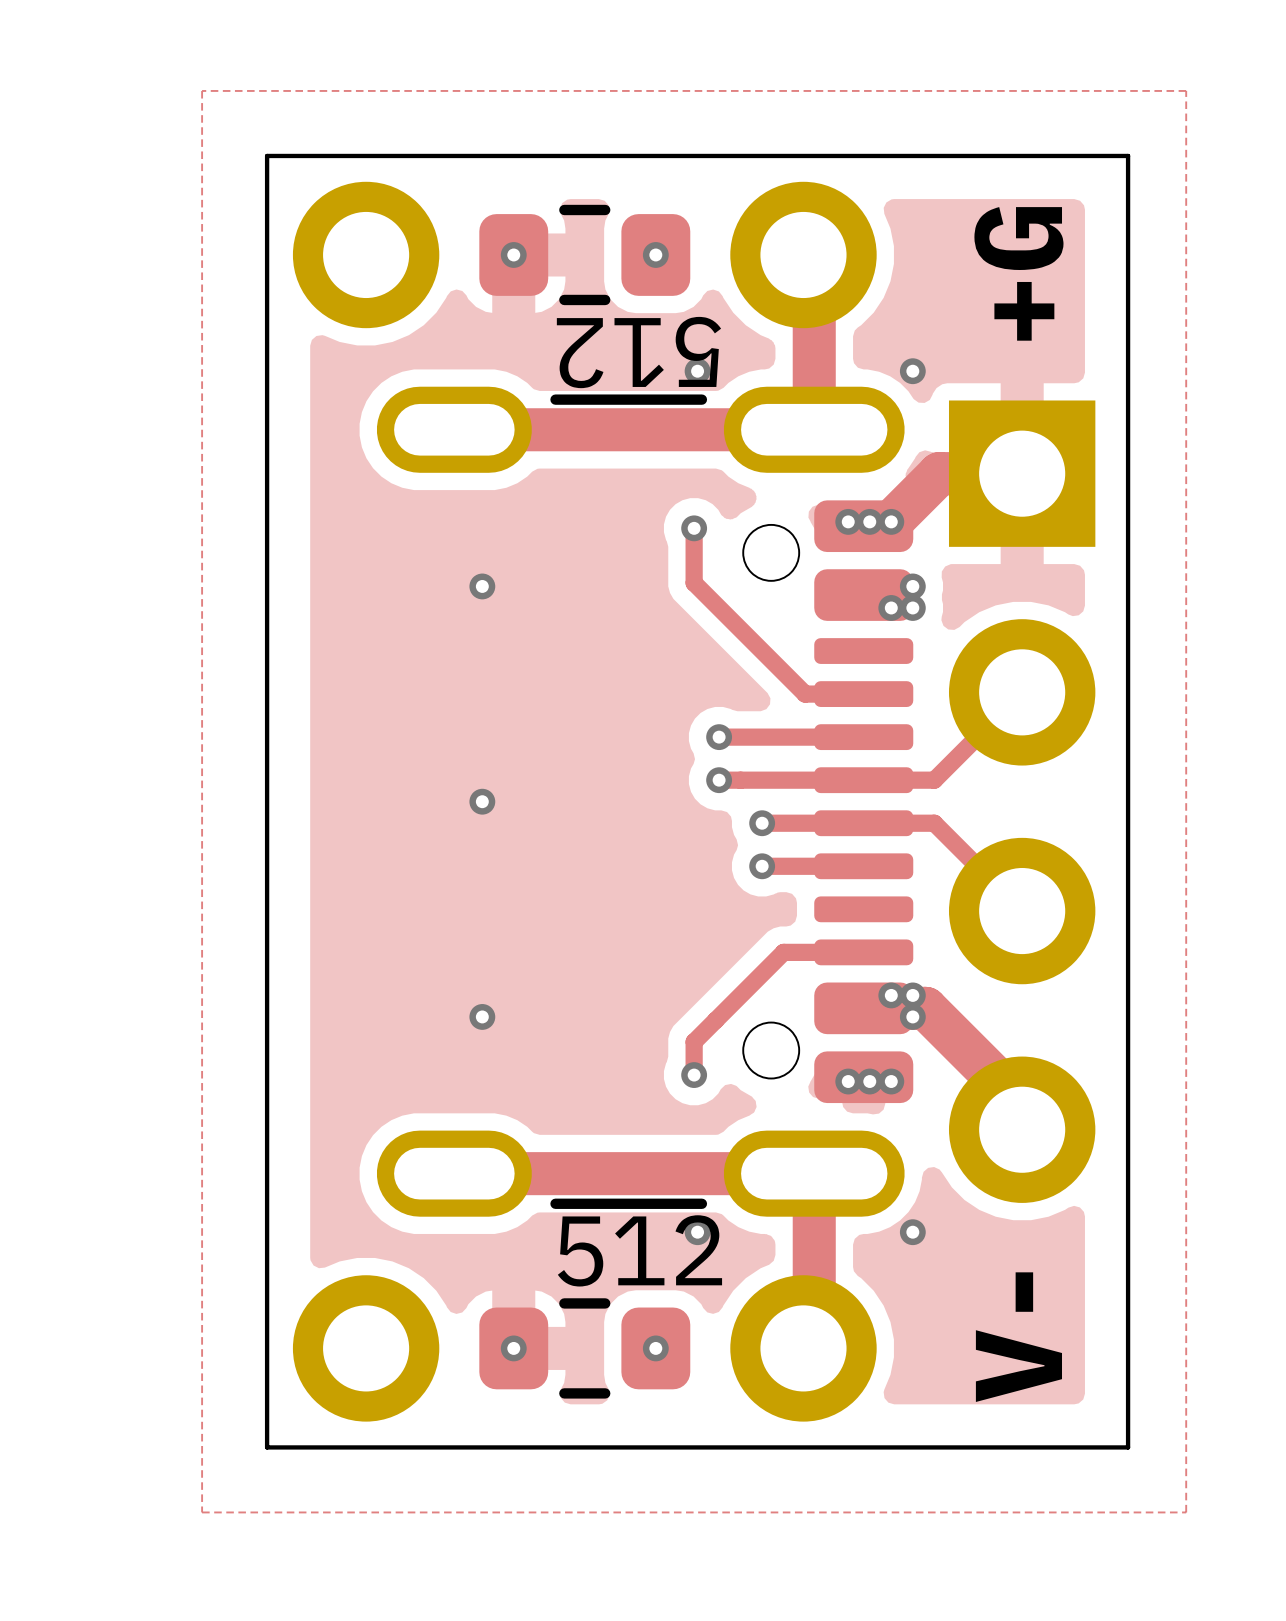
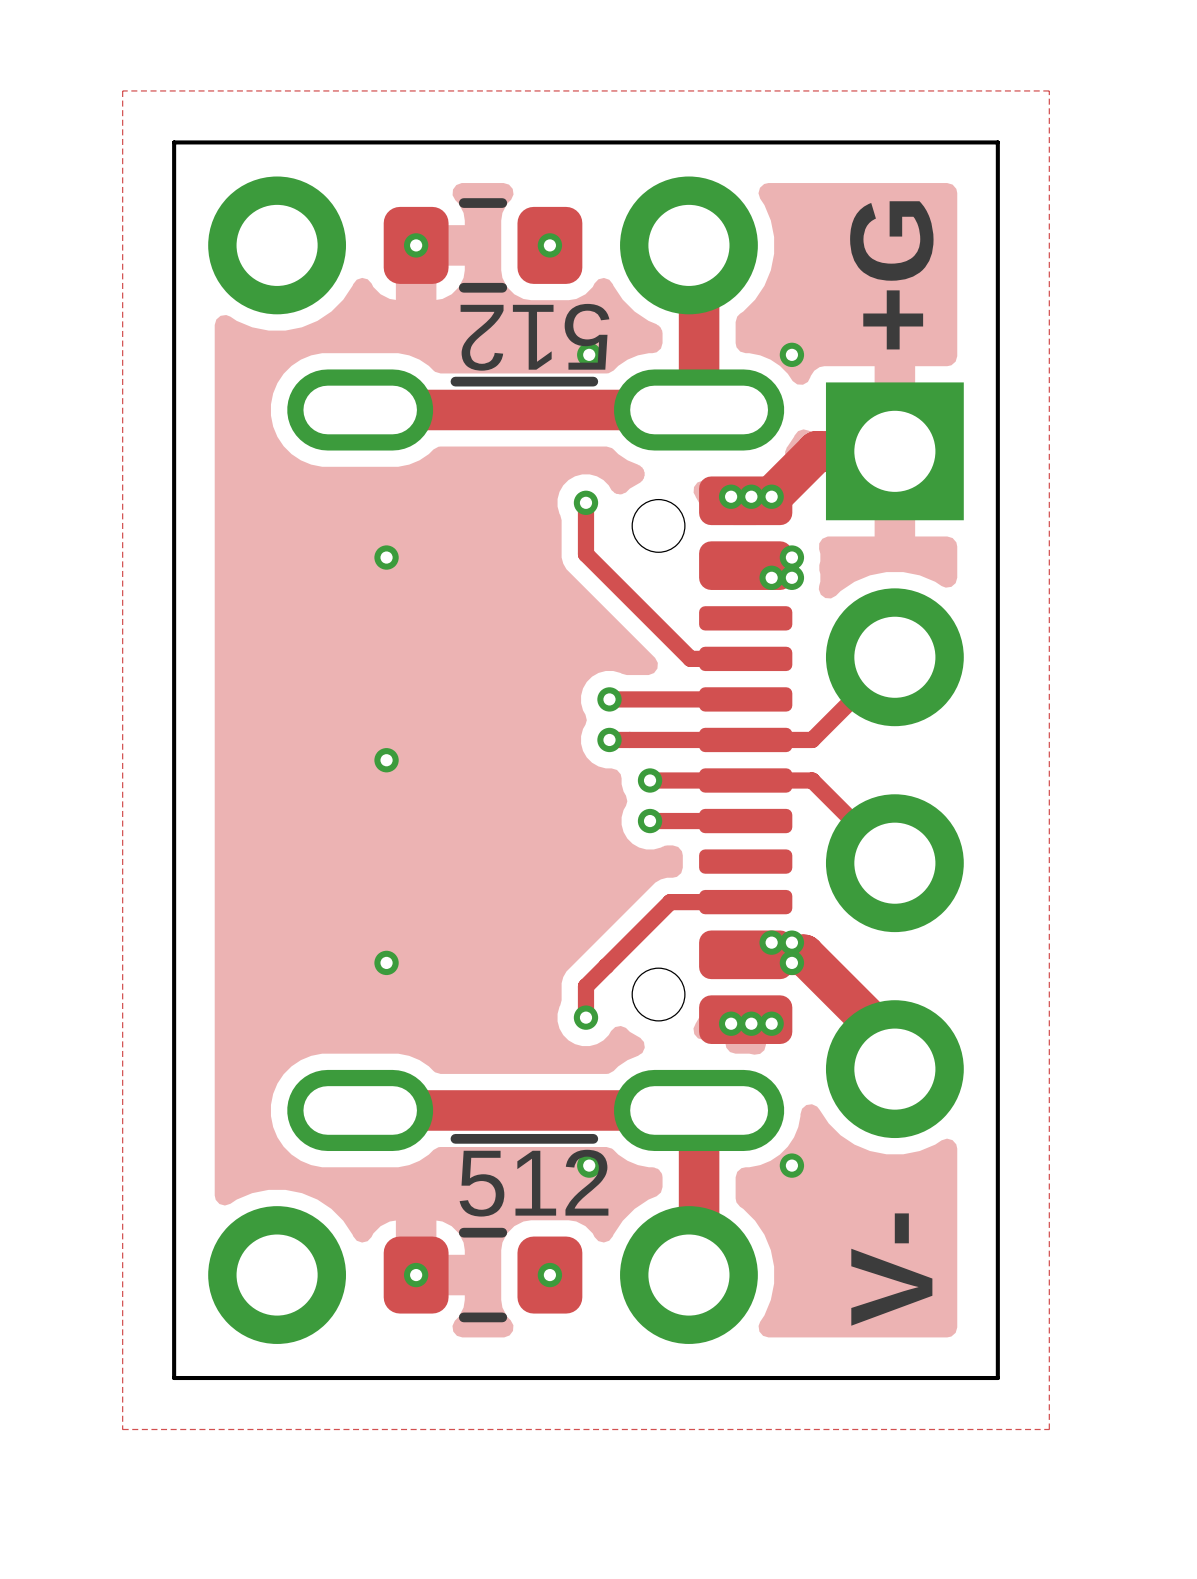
board edge: (267, 155) (267, 1447) (1128, 1447) (1128, 155) (267, 155) -> (174, 142) (174, 1378) (997, 1378) (997, 142) (174, 142)

